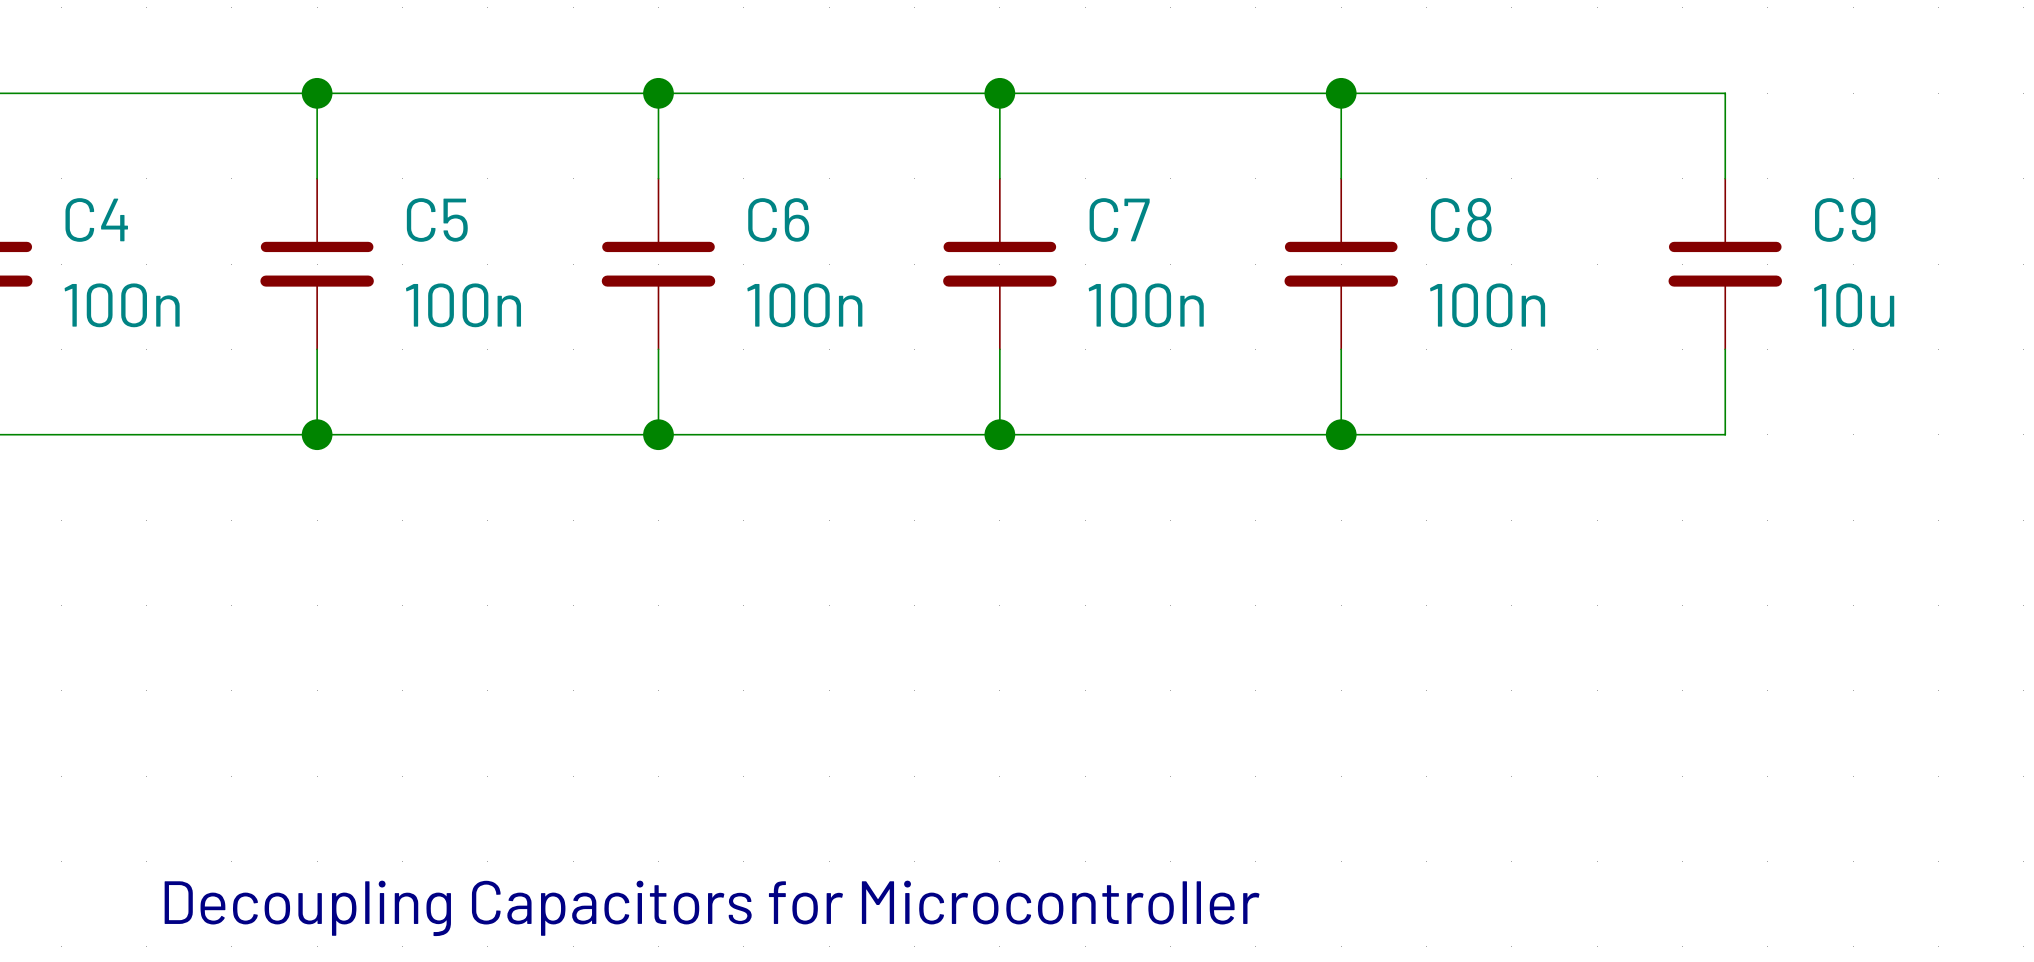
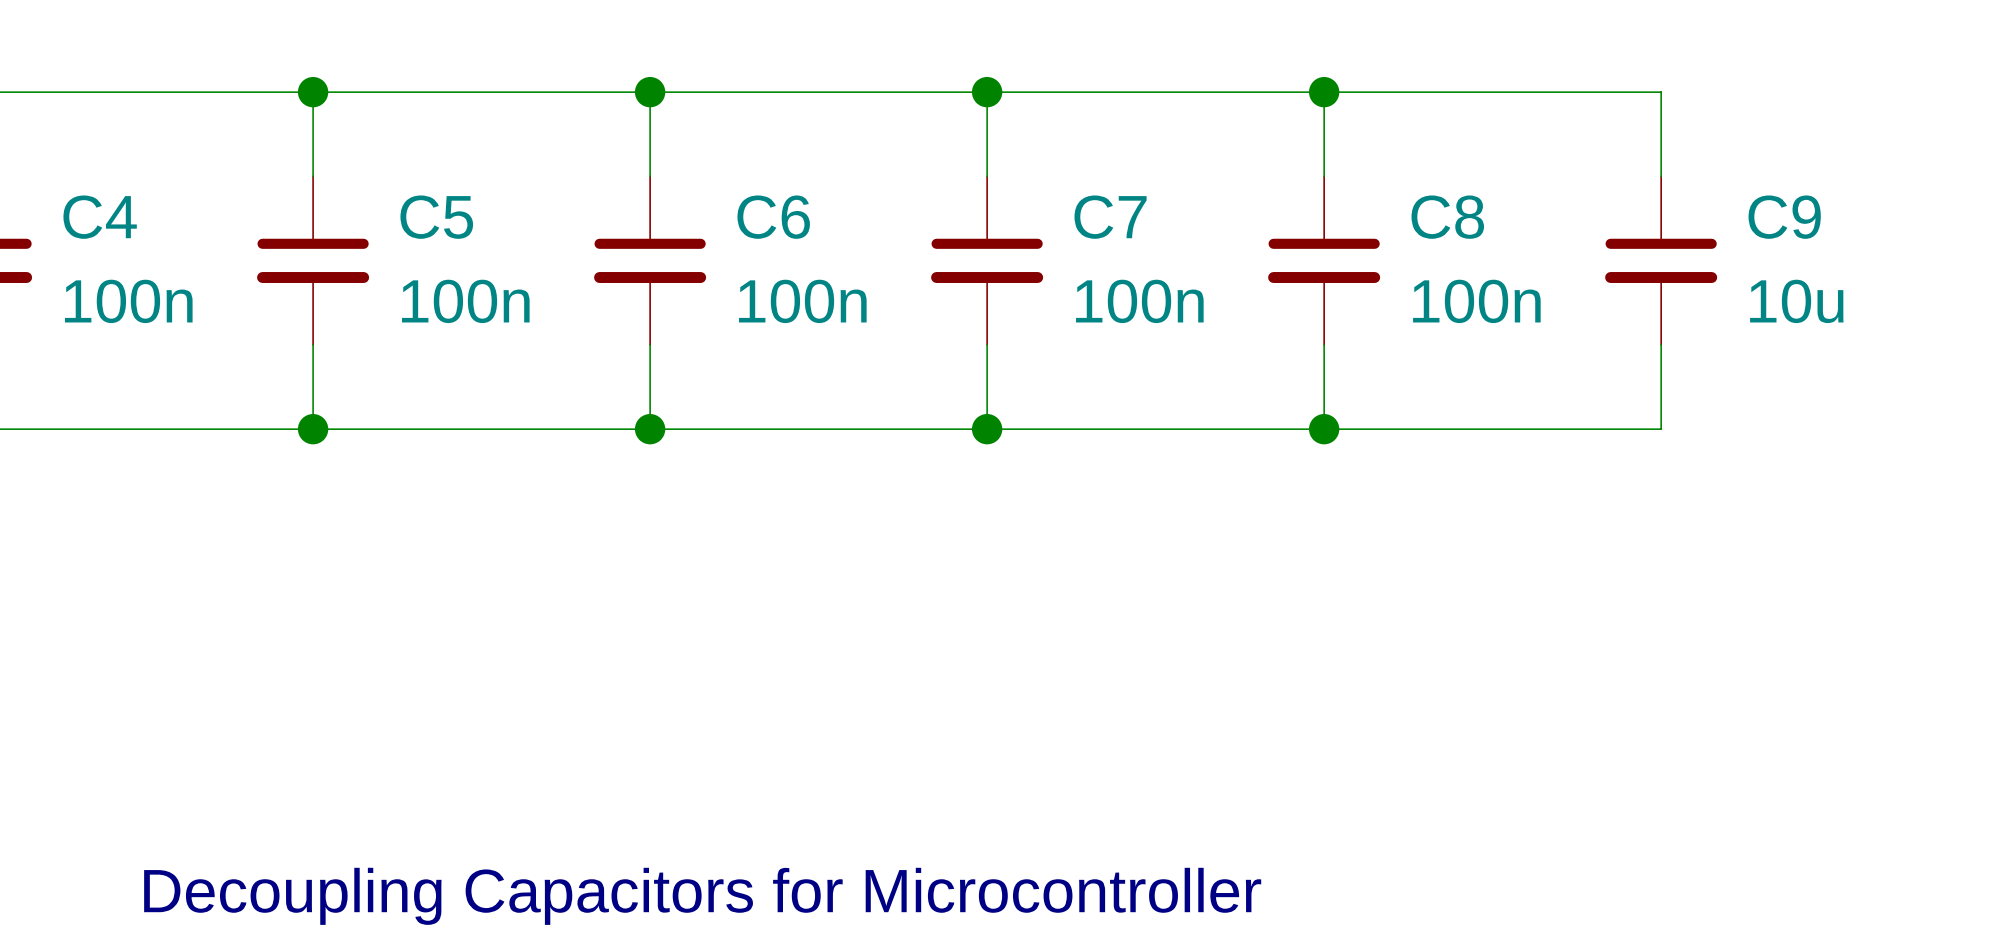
wire: (1682, 93) (1725, 93) (1725, 178) -> (1661, 92) (1661, 176)
C9 position: (1725, 264) -> (1661, 260)
wire: (1725, 349) (1725, 434) (1682, 434) -> (1661, 344) (1661, 429)

